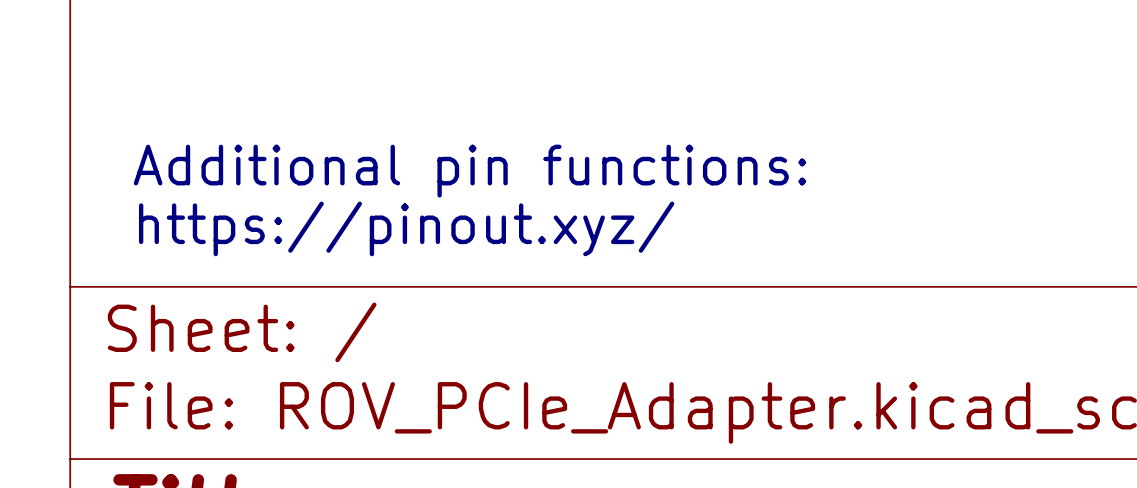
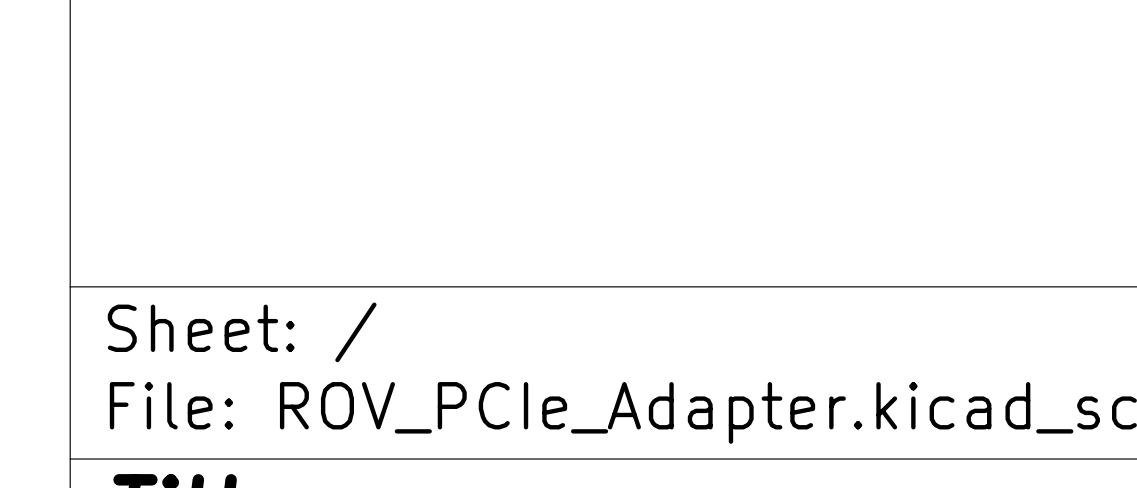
text: Additional pin functions: (469, 171) -> none
text: https://pinout.xyz/ (406, 228) -> none

